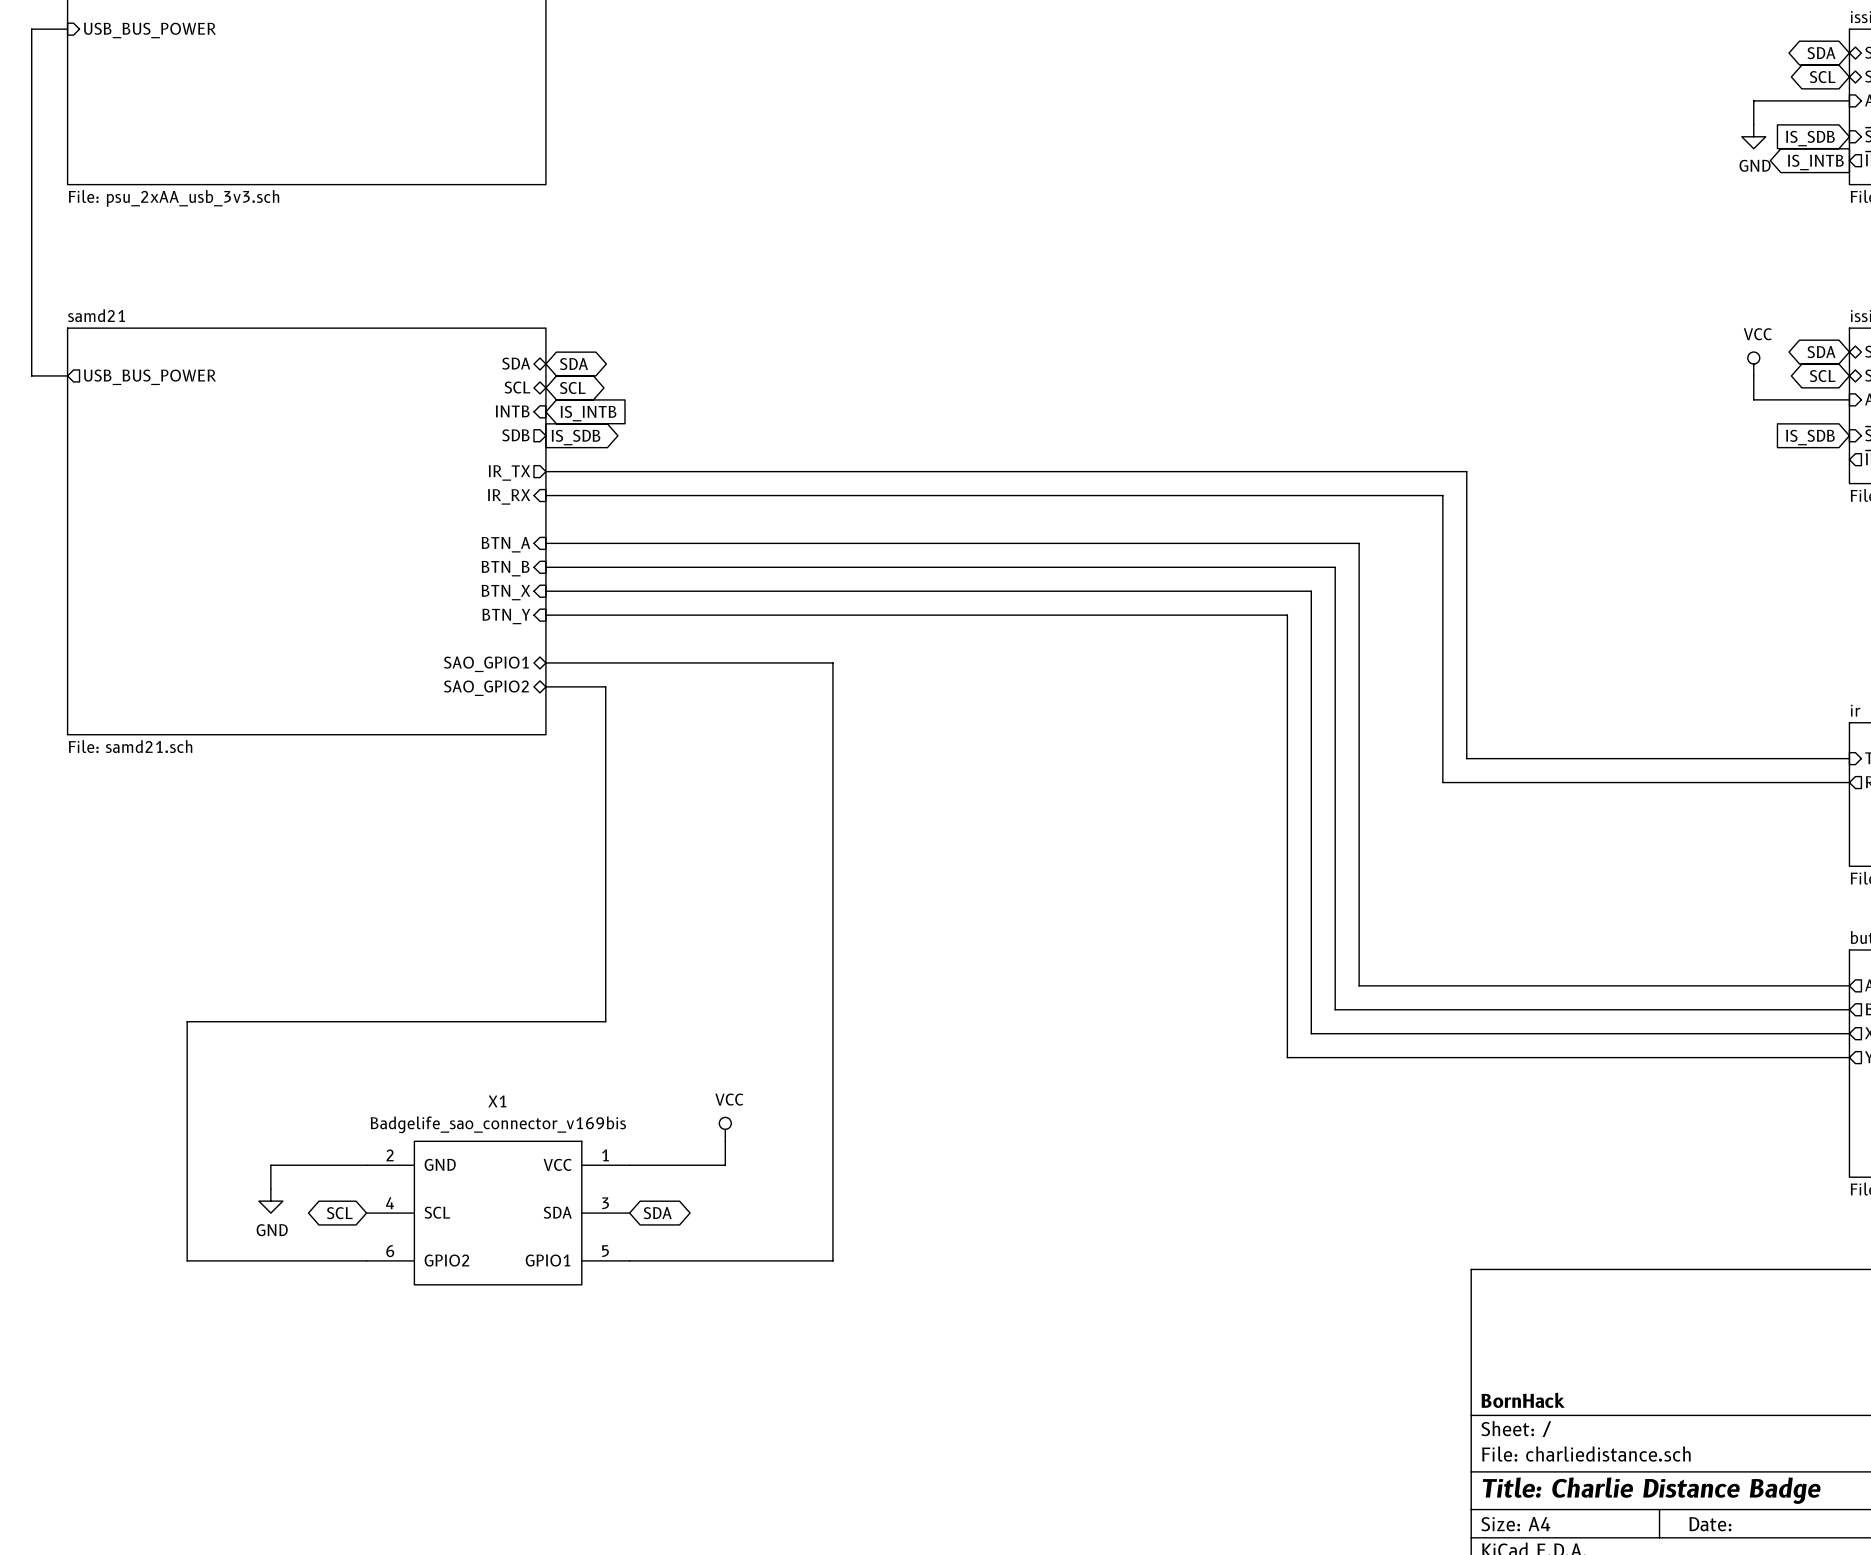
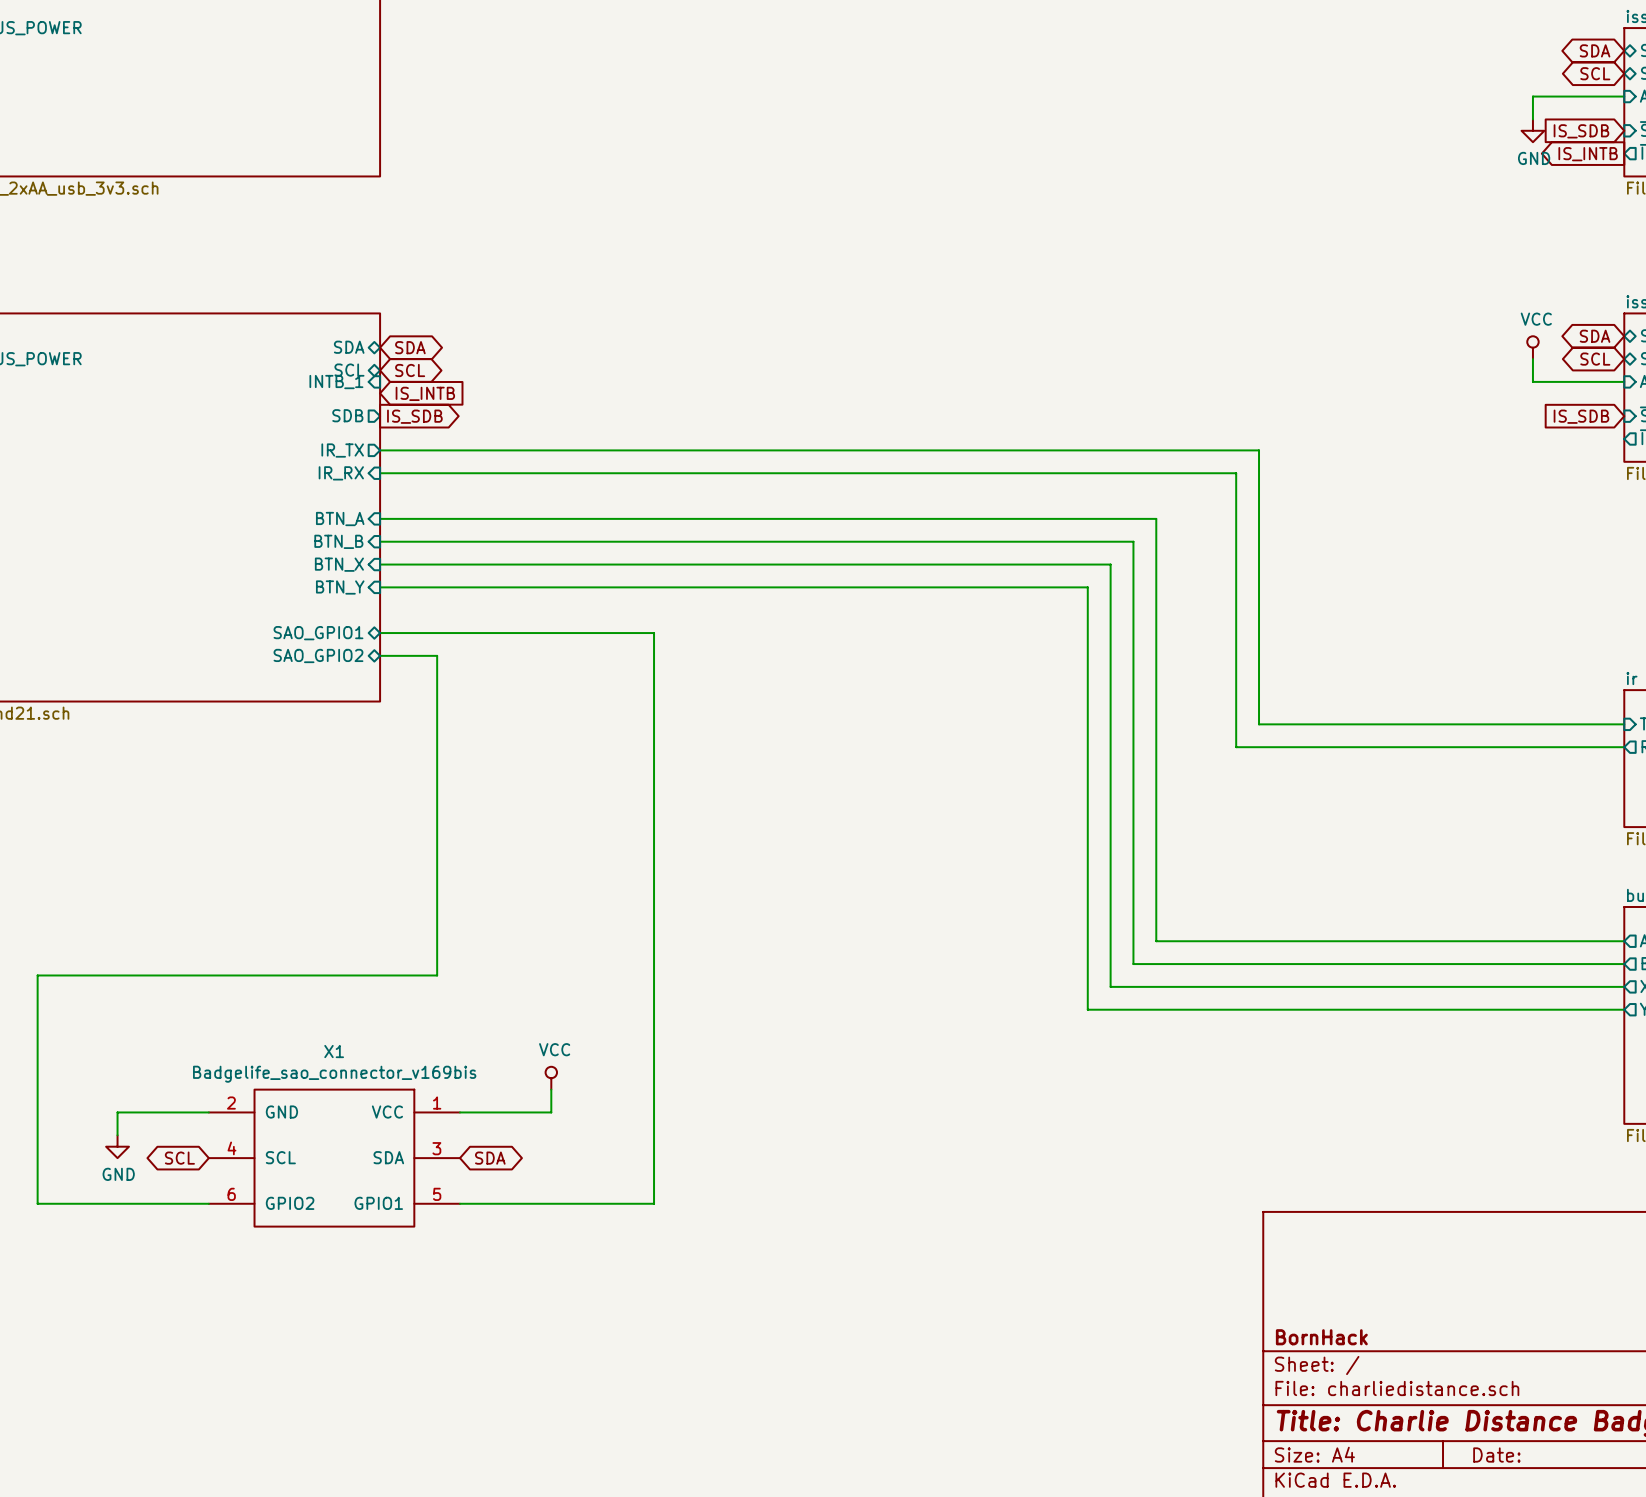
sheet pin: INTB (512, 411) -> INTB_1 (336, 382)

